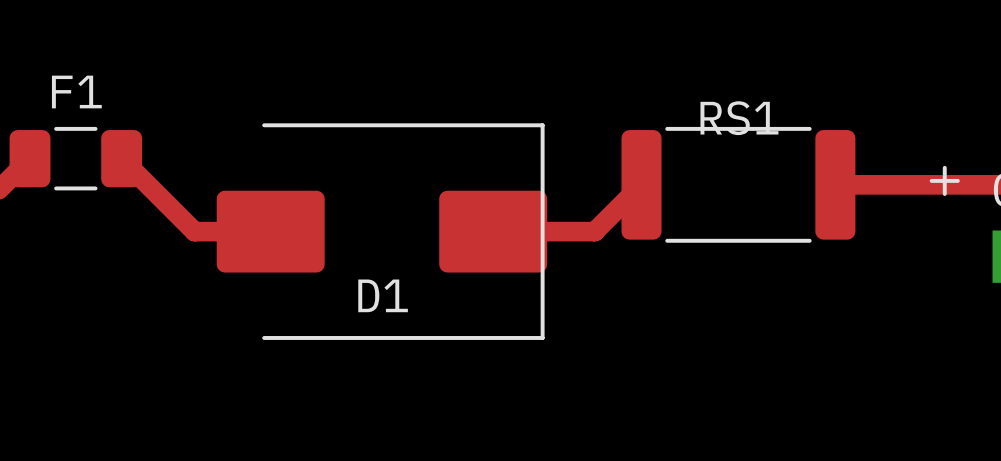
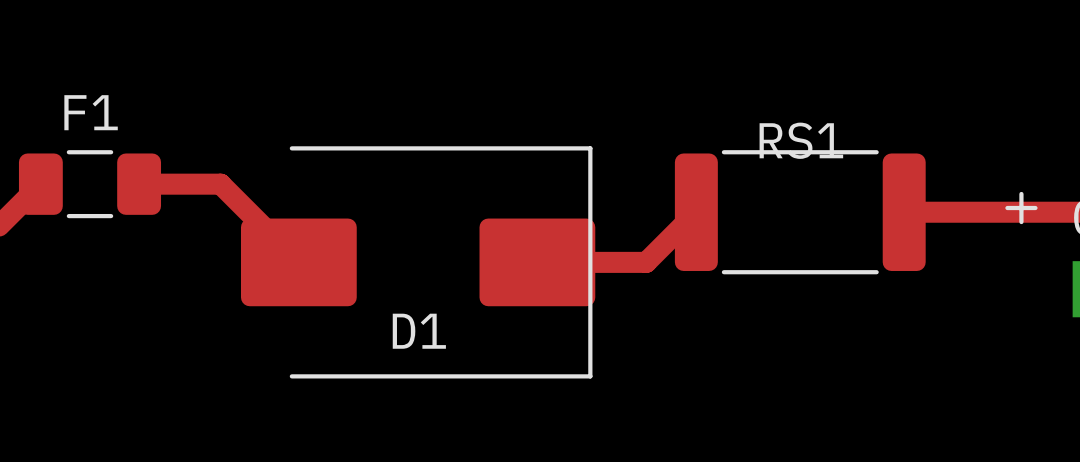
track: (121, 158) (194, 231) (270, 231) -> (139, 184) (220, 184) (298, 262)

